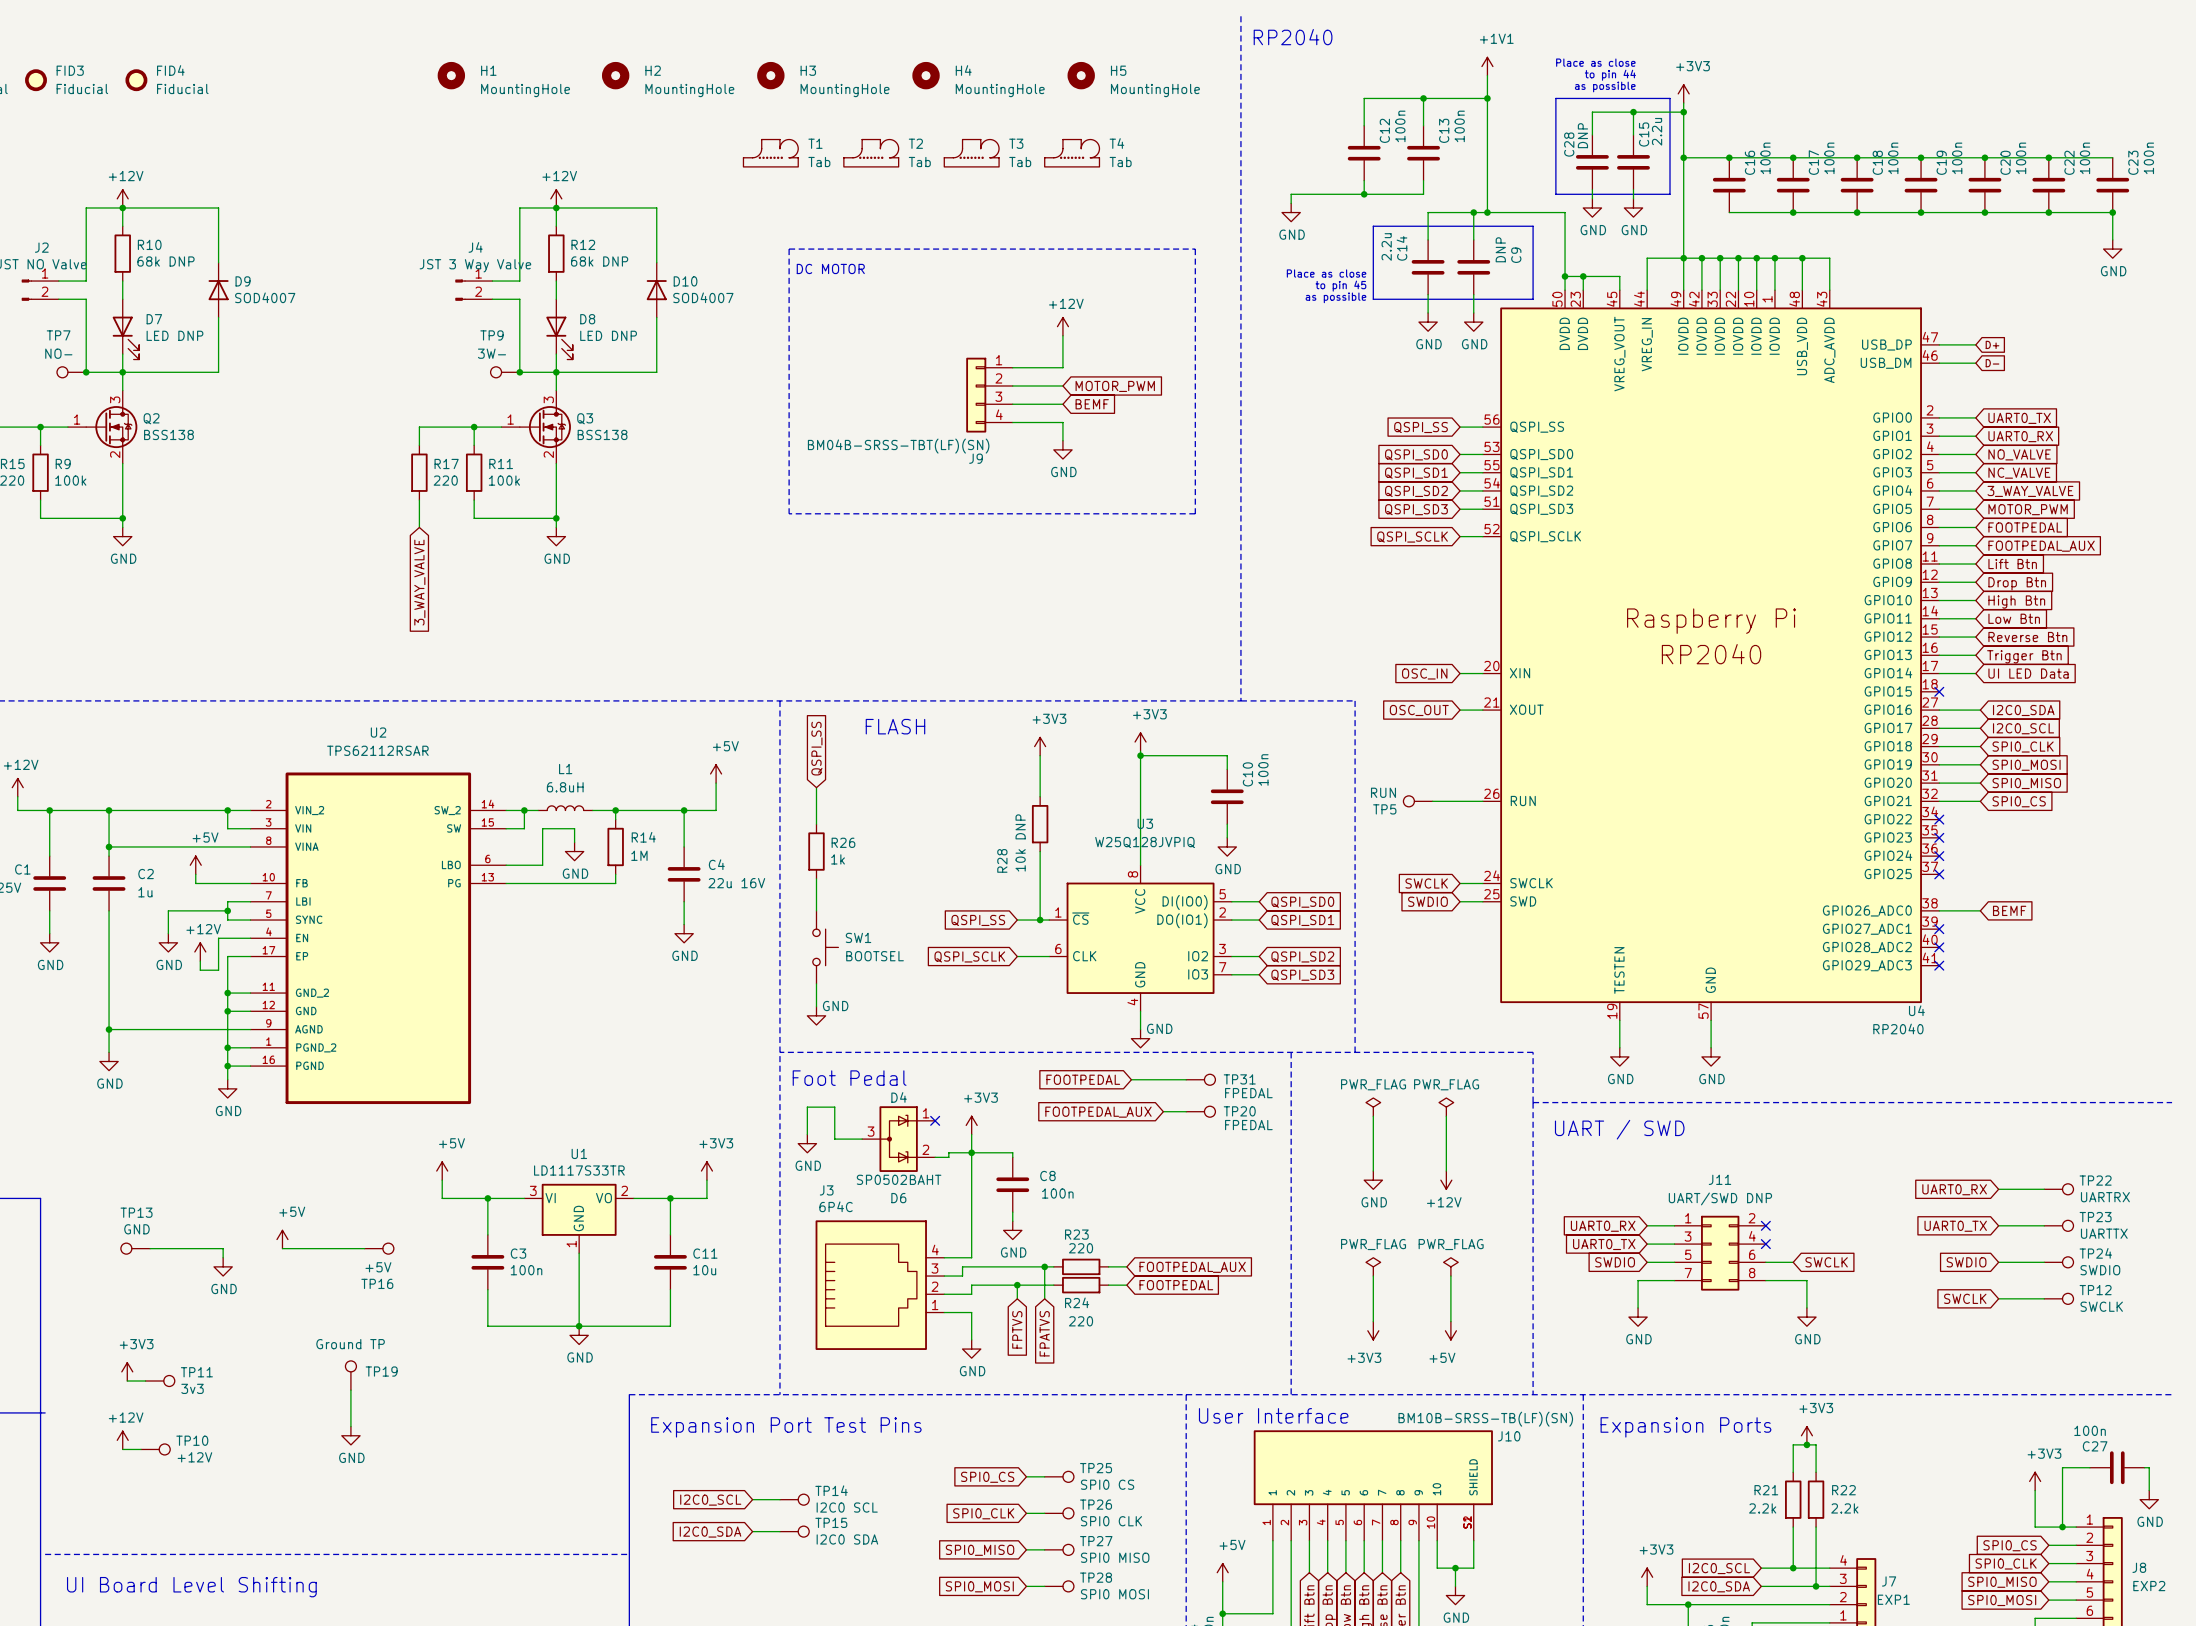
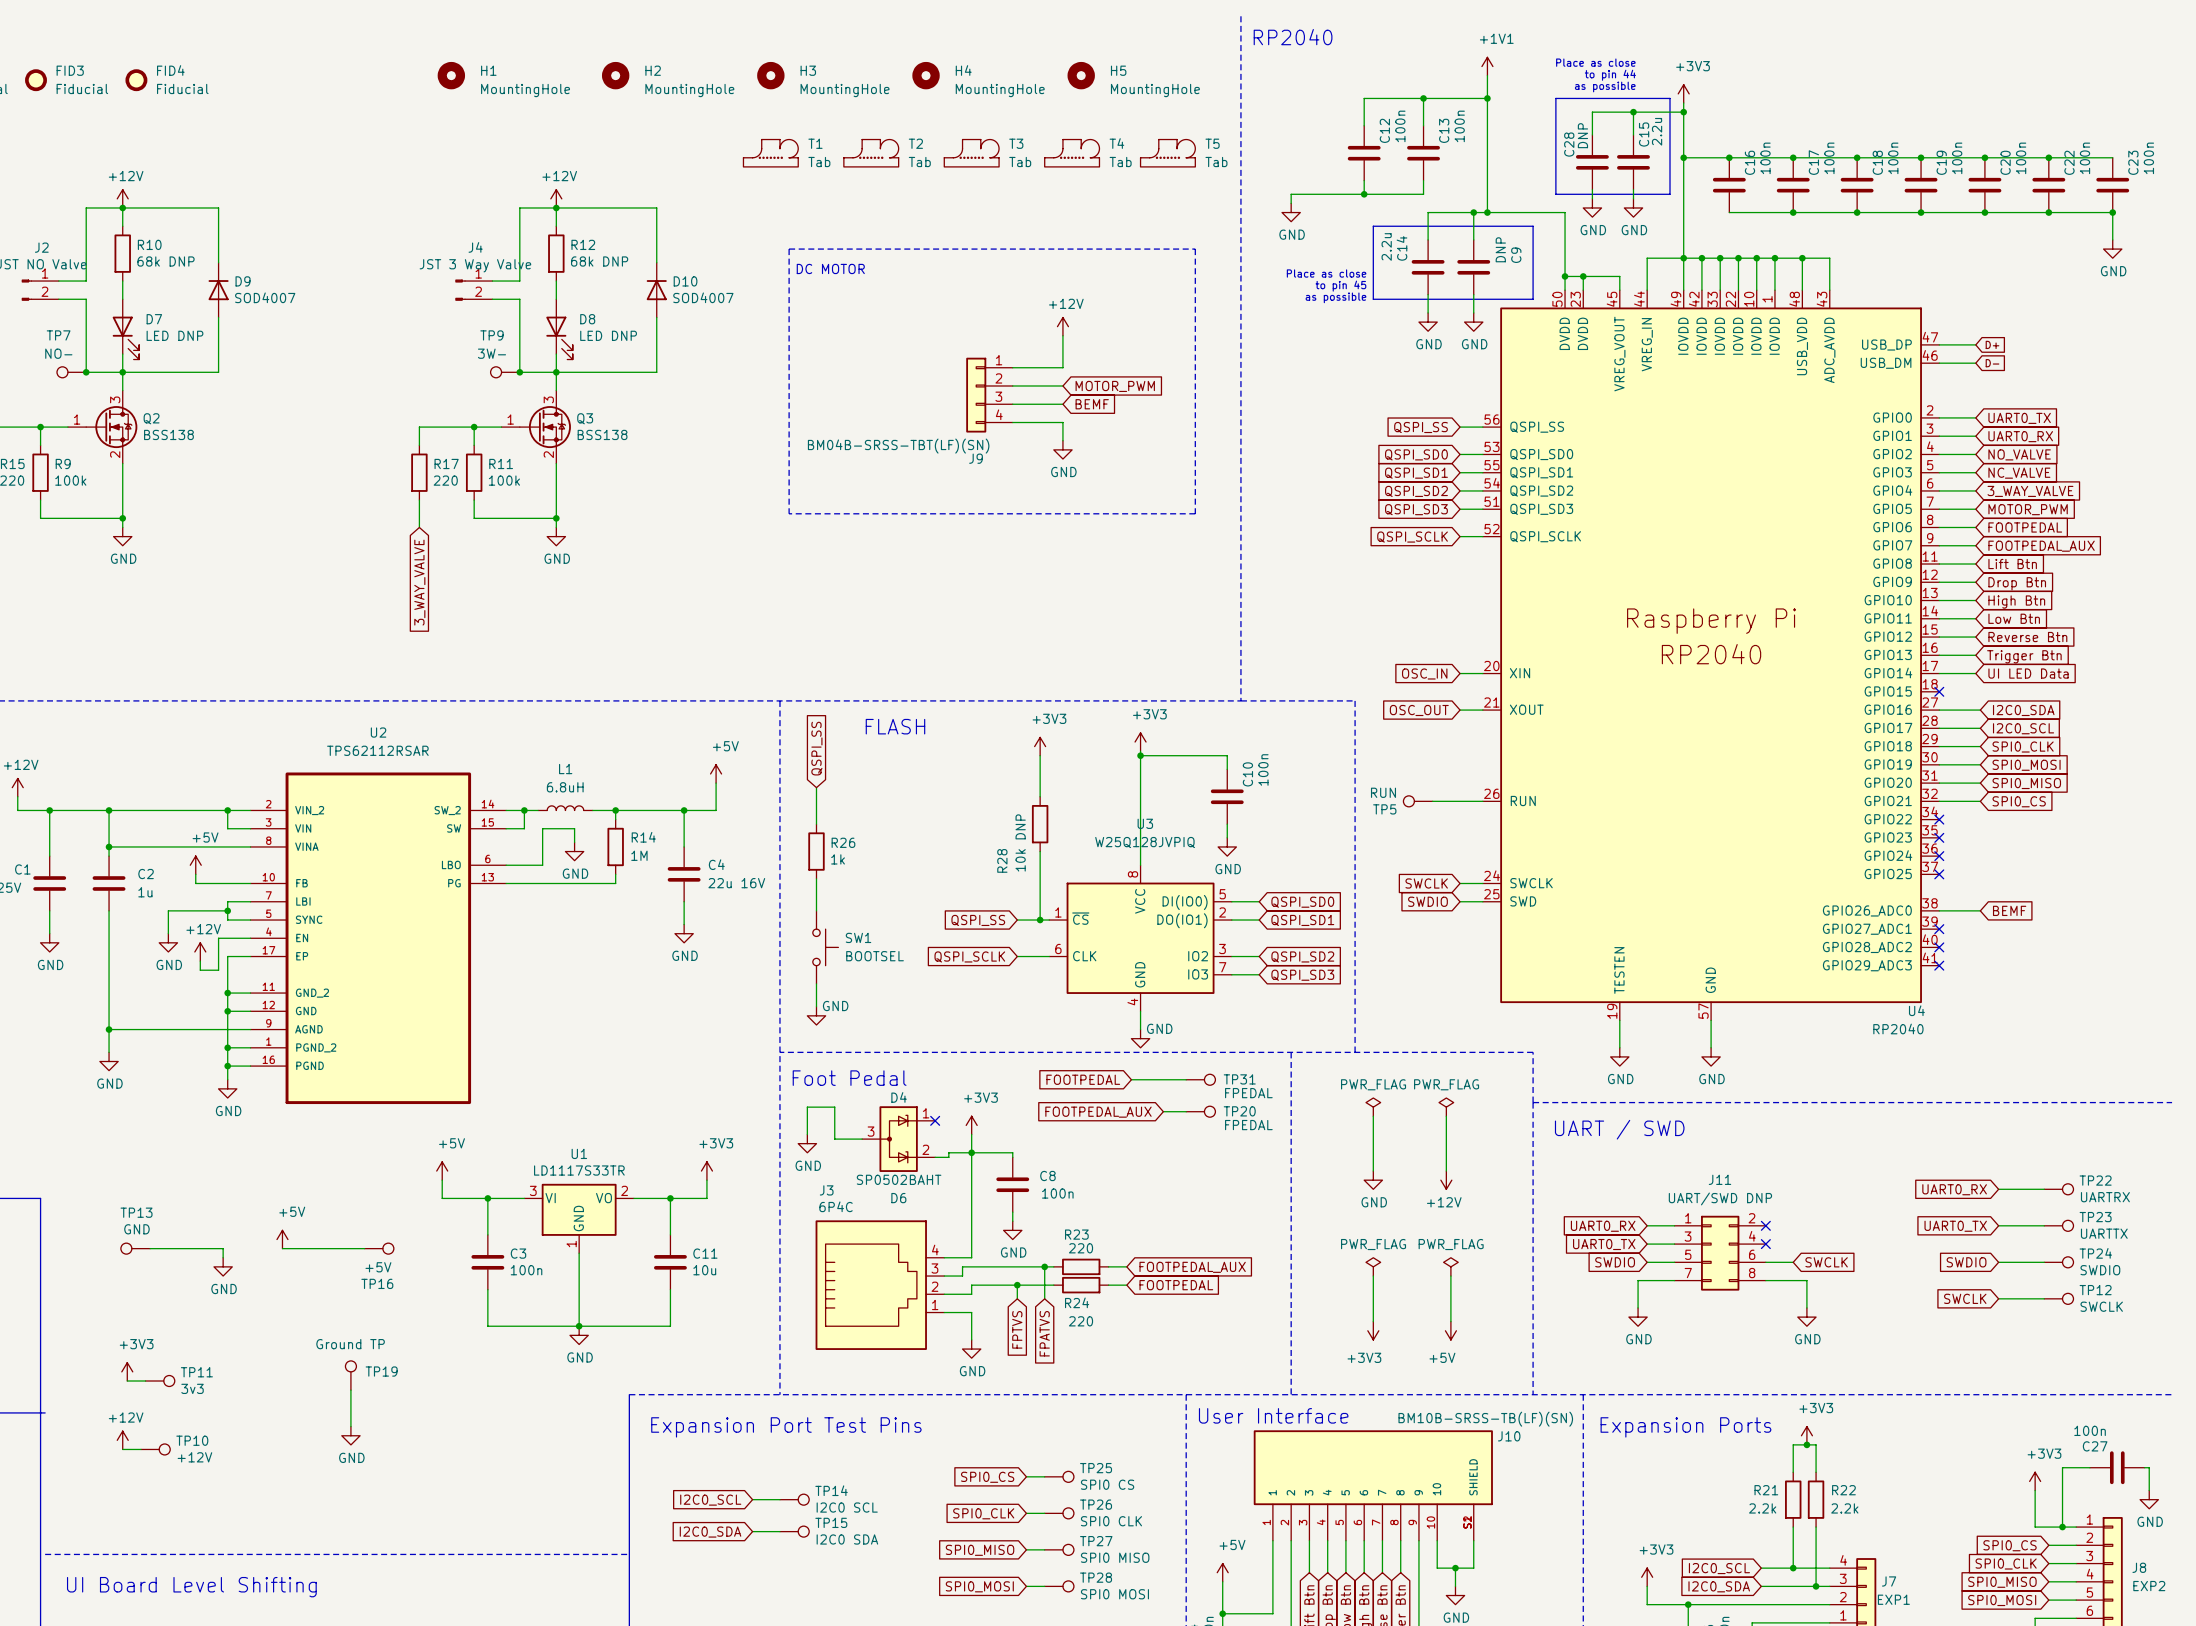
T5: none -> Tab (1167, 153)

